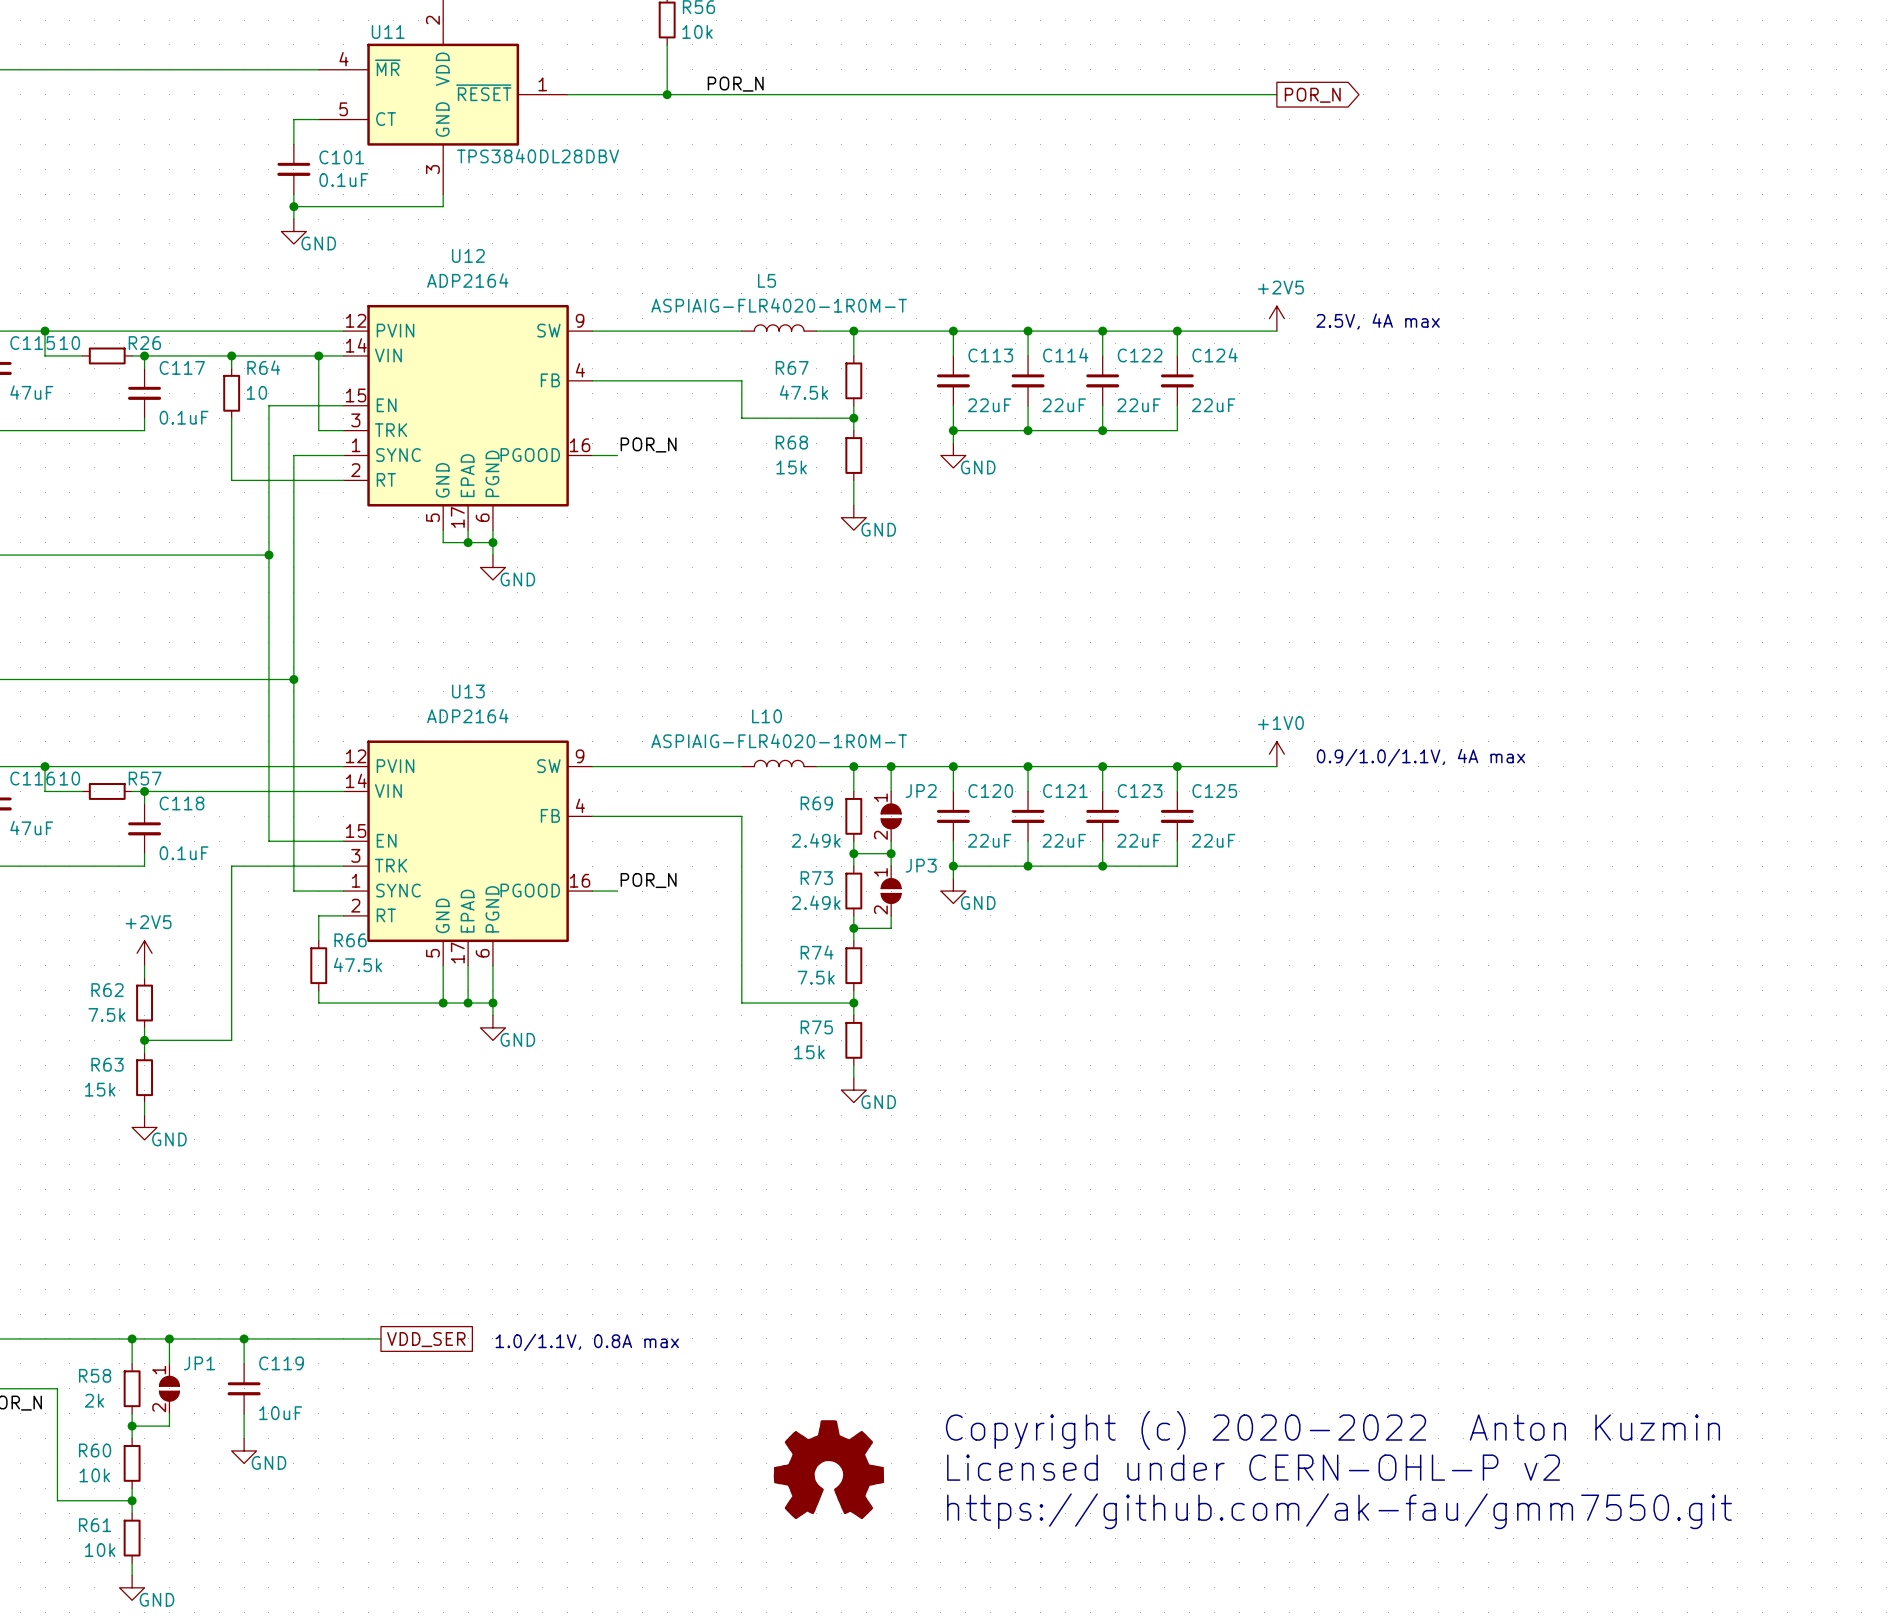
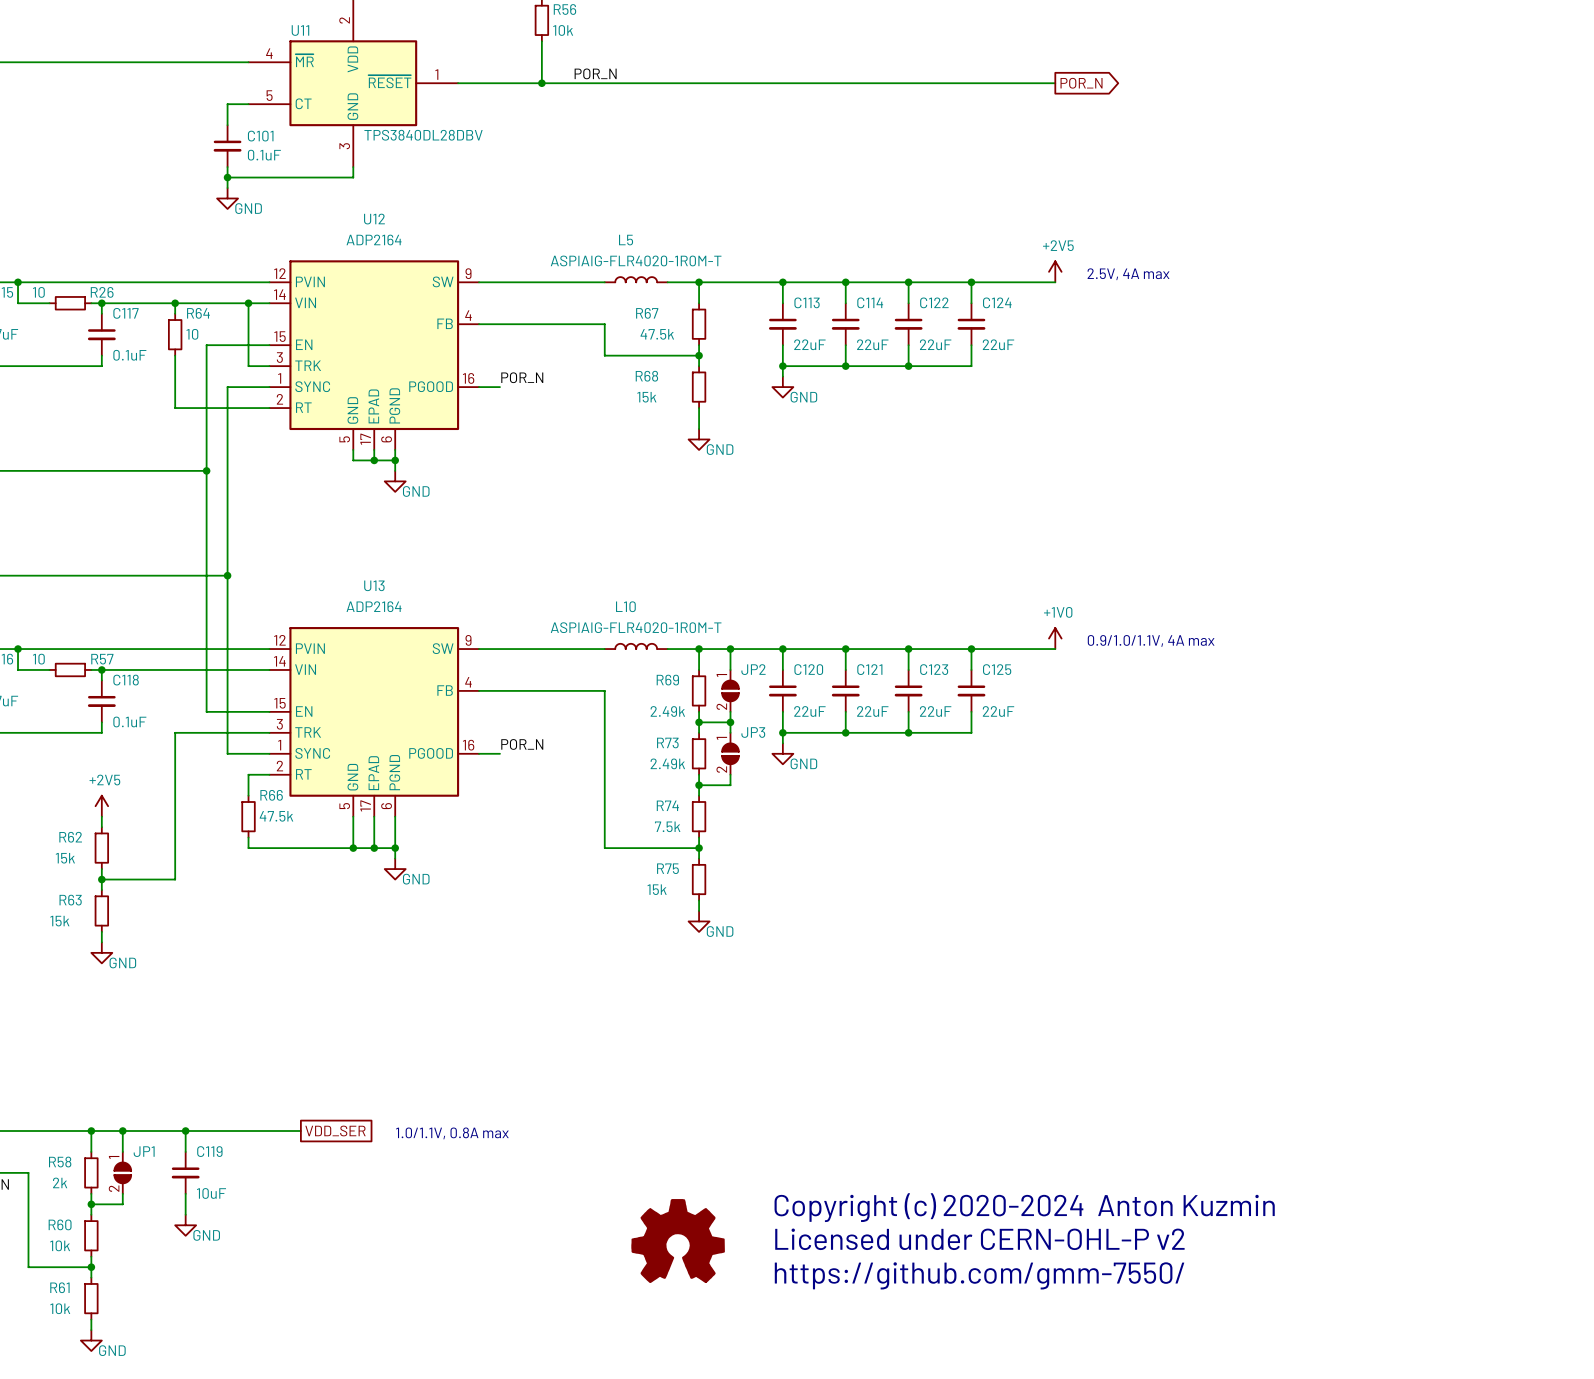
R62 value: 7.5k (106, 1014) -> 15k (65, 858)
text: Copyright (c) 2020-2022 Anton Kuzmin (1332, 1430) -> Copyright (c) 2020-2024 Anton Kuzmin (1024, 1207)
text: https://github.com/ak-fau/gmm7550.git (1339, 1511) -> https://github.com/gmm-7550/ (979, 1275)

